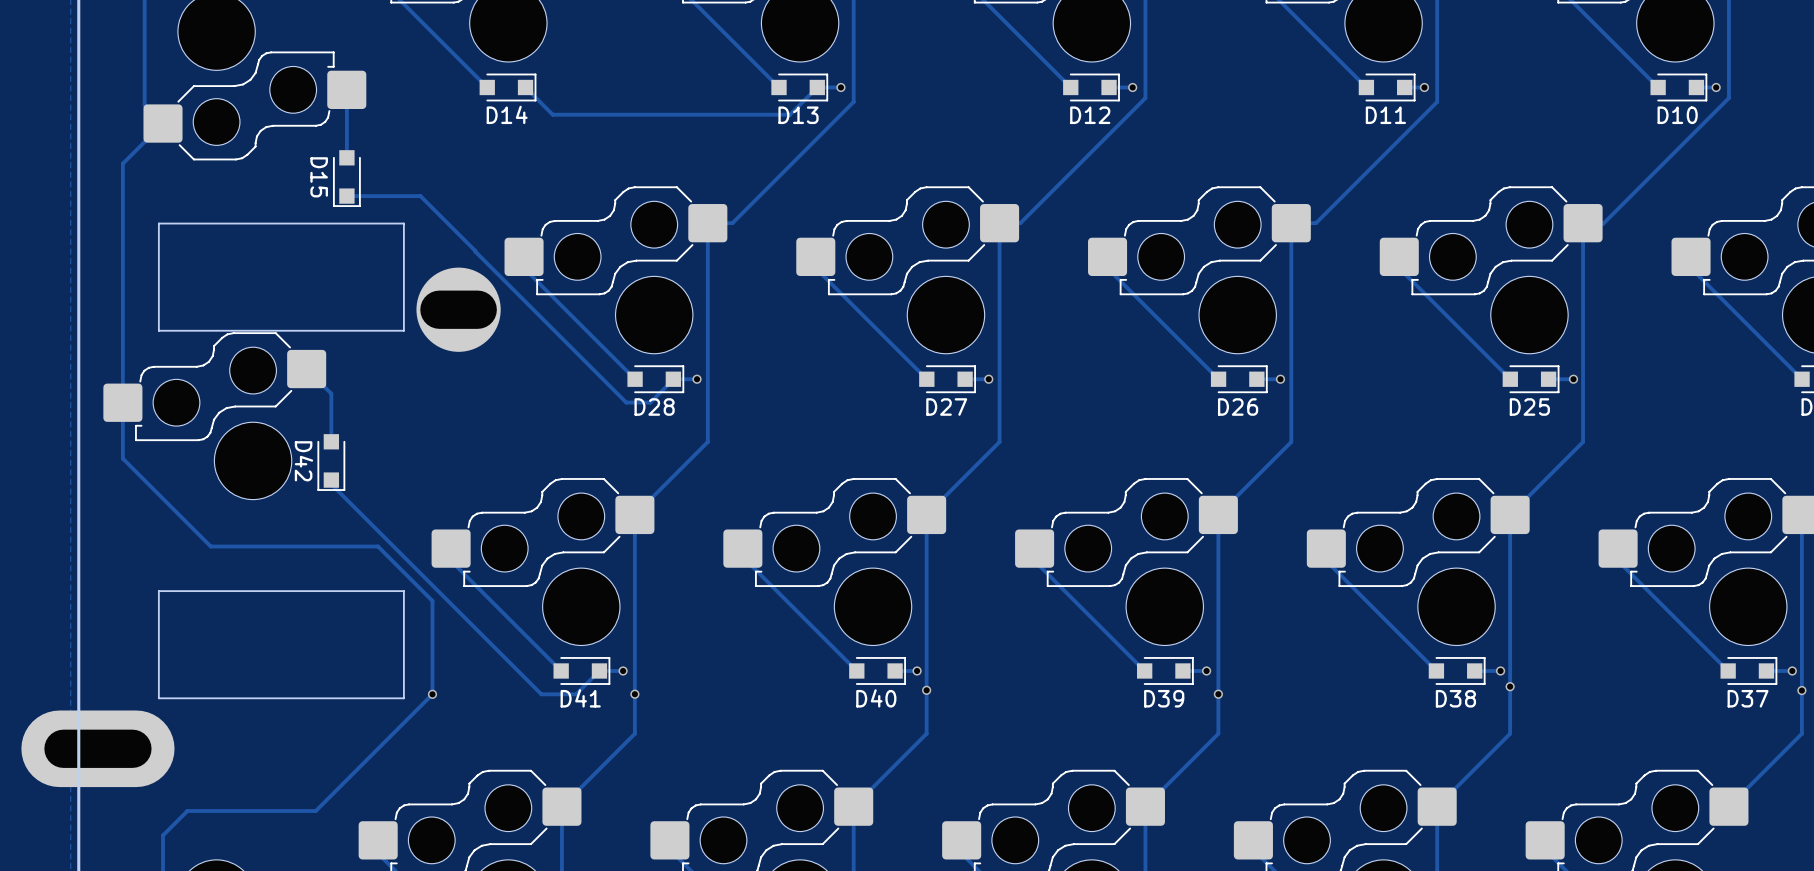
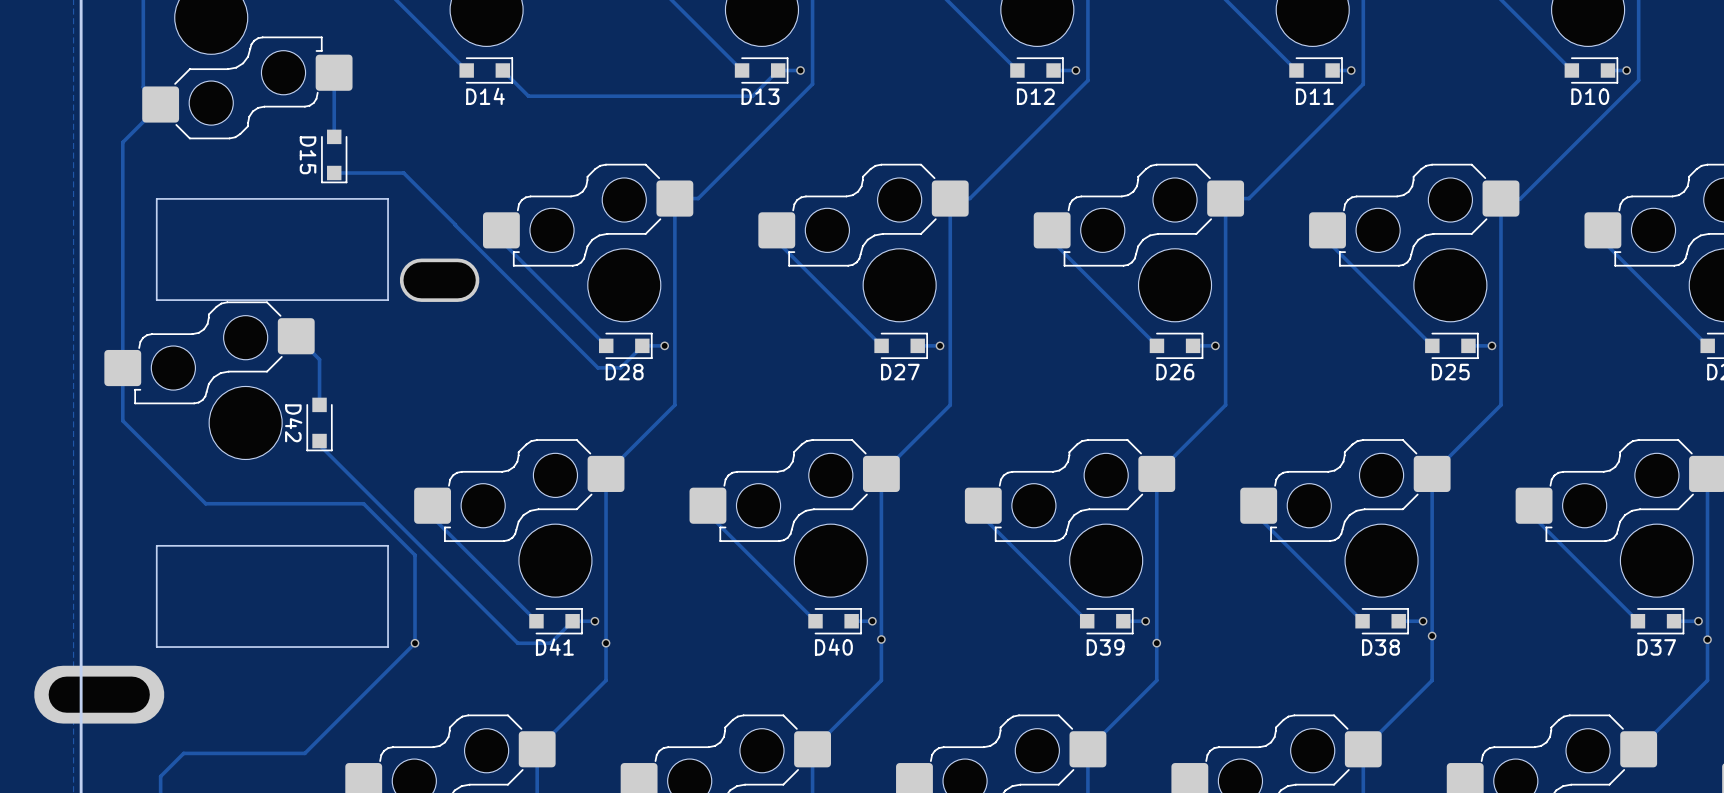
part footprint: [416, 267, 501, 352] -> [399, 258, 480, 302]
part footprint: [21, 710, 175, 788] -> [34, 665, 165, 724]

